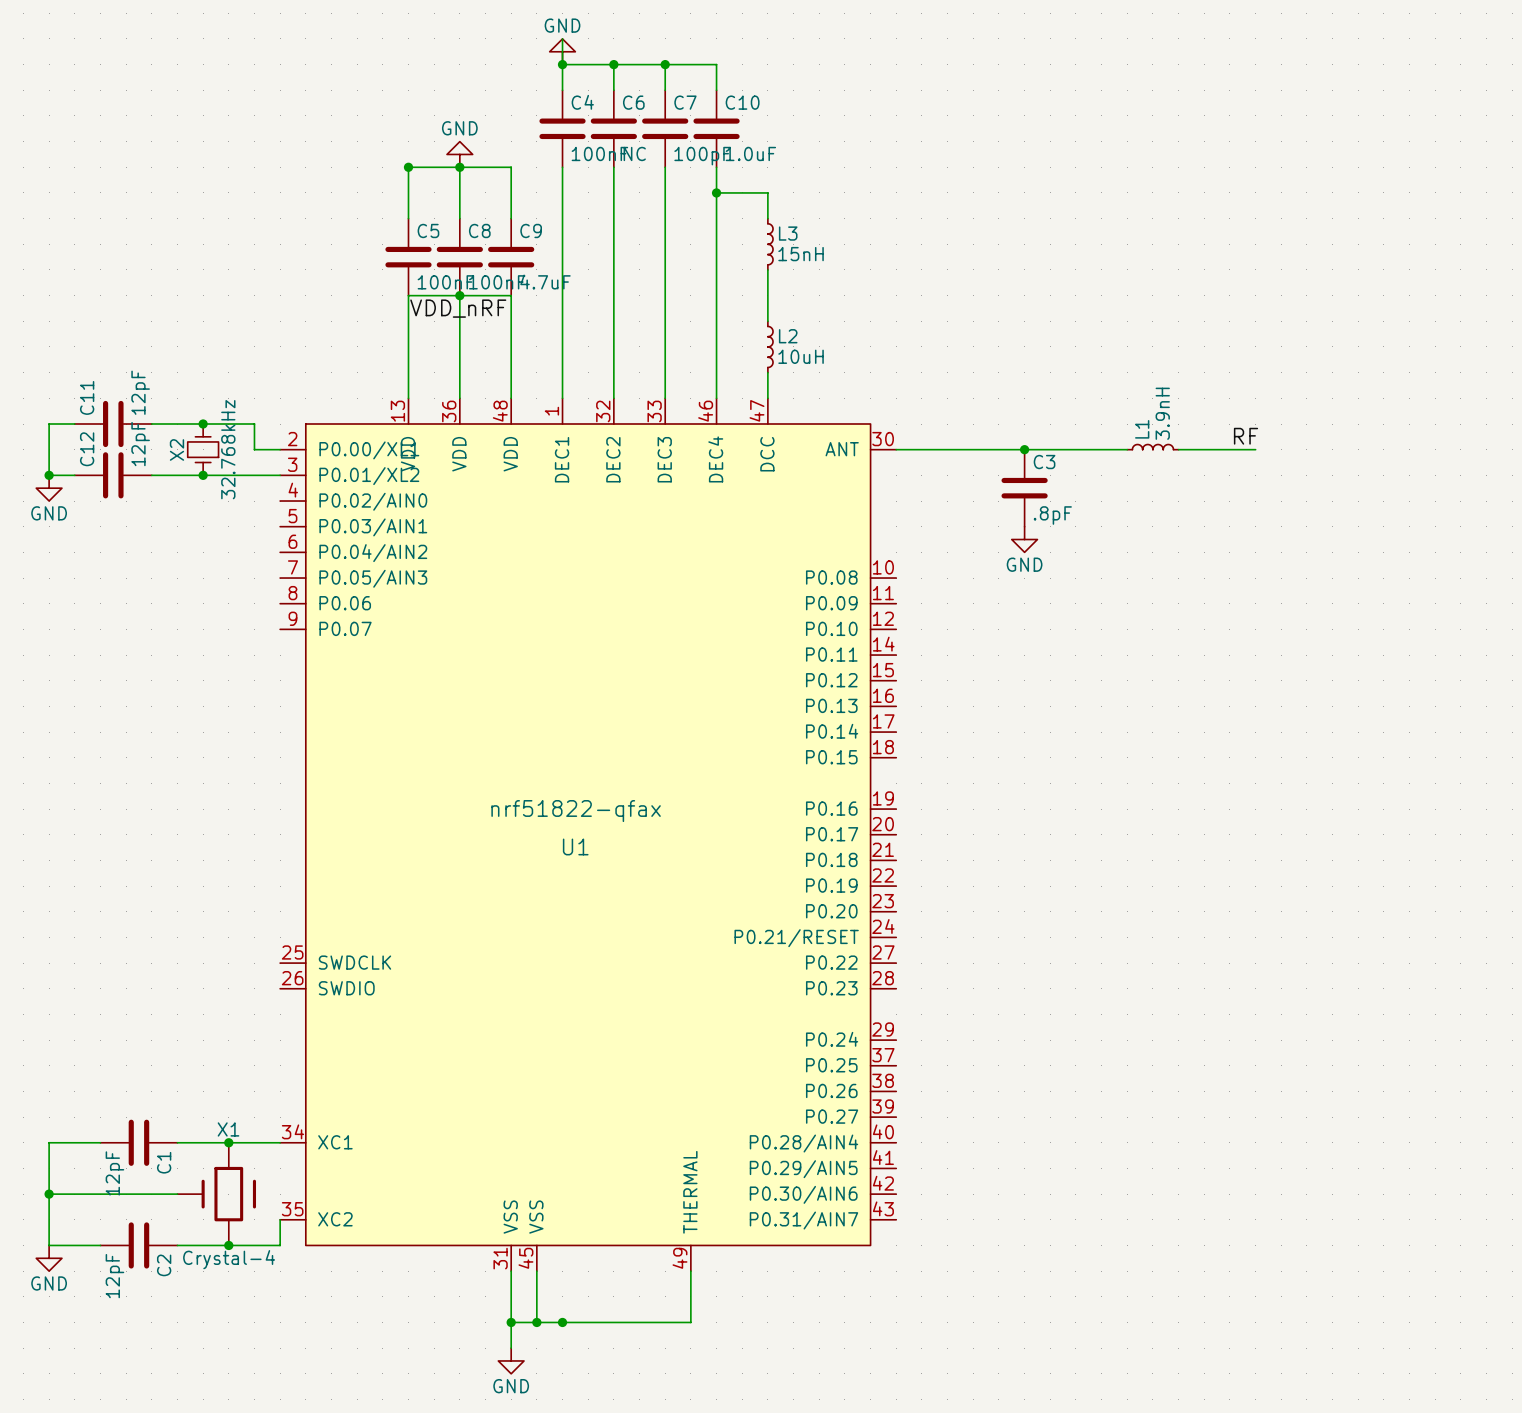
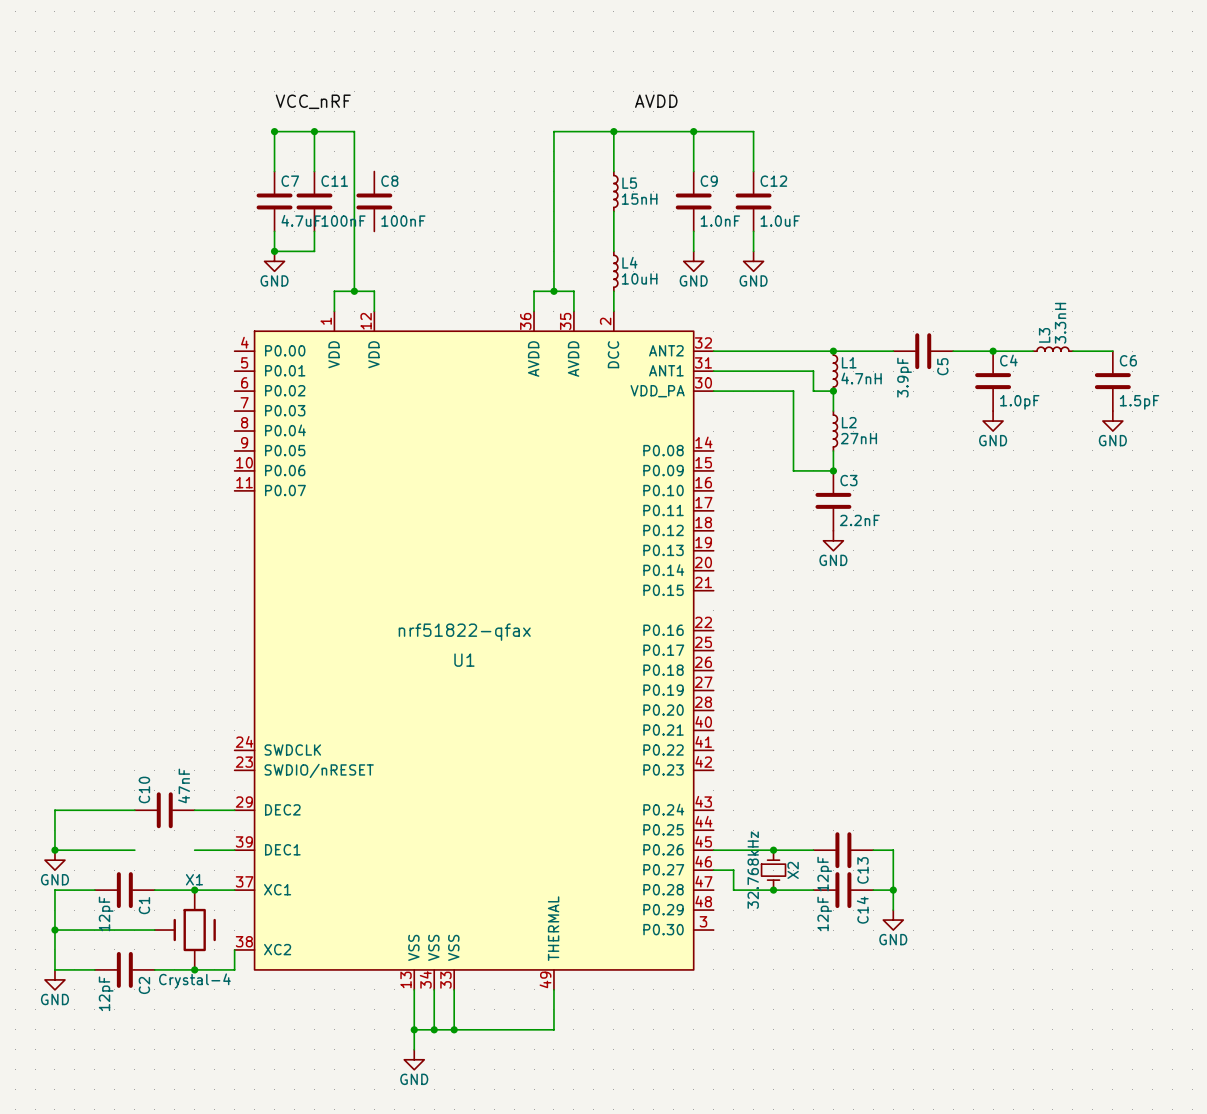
wire: (562, 38) (562, 90) -> none
power symbol: GND (562, 51) -> none
wire: (562, 64) (716, 64) (716, 90) -> none
junction: (562, 64) -> none
wire: (613, 64) (613, 90) -> none
junction: (613, 64) -> none
wire: (665, 64) (665, 90) -> none
junction: (665, 64) -> none
C10 name position: C10 (742, 102) -> C10 (144, 789)
label: none -> VCC_nRF (313, 101)
C4 position: (562, 128) -> (993, 381)
C6 position: (613, 128) -> (1112, 381)
C7 position: (665, 128) -> (274, 201)
C10 rotation: 0° (716, 128) -> 90° clockwise (164, 810)
C10 position: (716, 128) -> (164, 810)
label: none -> AVDD (656, 101)
C4 value: 100nF (599, 153) -> 1.0pF (1019, 402)
C6 value: NC (634, 153) -> 1.5pF (1139, 402)
C10 value: 1.0uF (750, 153) -> 47nF (184, 785)
power symbol: GND (459, 154) -> none
C7 value: 100pF (702, 156) -> 4.7uF (301, 220)
junction: none -> (274, 131)
wire: (408, 167) (408, 218) -> (334, 131) (274, 131) (274, 171)
junction position: (408, 167) -> (314, 131)
wire: (434, 167) (511, 167) (511, 218) -> (354, 131) (354, 291)
wire: (459, 167) (459, 218) -> (314, 131) (314, 171)
junction: (459, 167) -> none
wire: (562, 167) (562, 398) -> none
wire: (613, 167) (613, 398) -> none
wire: (665, 167) (665, 372) -> (573, 291) (534, 291)
wire: (716, 167) (716, 372) -> none
wire: none -> (693, 131) (693, 171)
junction: none -> (693, 131)
wire: (716, 192) (767, 192) -> (613, 131) (613, 151)
junction position: (716, 192) -> (613, 131)
wire: none -> (753, 171) (753, 131) (553, 131) (553, 291)
L3 name: L3 (788, 233) -> L5 (629, 183)
C5 rotation: 0° (408, 257) -> 90° clockwise (923, 351)
C5 position: (408, 257) -> (923, 351)
C9 position: (511, 257) -> (693, 201)
C5 value: 100nF (445, 282) -> 3.9pF (904, 377)
C9 value: 4.7uF (545, 282) -> 1.0nF (720, 221)
wire: none -> (274, 231) (274, 251) (314, 251) (314, 231)
wire: (459, 295) (459, 372) -> none
junction: (459, 295) -> none
wire: none -> (693, 231) (693, 251)
wire: none -> (753, 231) (753, 251)
label: VDD_nRF (458, 308) -> none
junction: none -> (274, 251)
power symbol: none -> GND (274, 261)
power symbol: none -> GND (693, 261)
power symbol: none -> GND (753, 261)
L2 name: L2 (788, 336) -> L4 (629, 262)
wire: (408, 372) (408, 295) (511, 295) (511, 398) -> (334, 291) (374, 291)
junction: none -> (354, 291)
junction: none -> (553, 291)
C11 value: 12pF (140, 392) -> 100nF (343, 221)
U1 symbol: [280, 398, 897, 1272] -> [234, 311, 714, 990]
L1 value: 3.9nH (1162, 413) -> 4.7nH (861, 378)
wire: (74, 424) (49, 424) (49, 475) (74, 475) -> none
C11 rotation: 0° (113, 424) -> 90° clockwise (314, 201)
C11 position: (113, 424) -> (314, 201)
wire: (151, 424) (254, 424) (254, 449) (280, 449) -> none
junction: (203, 424) -> none
label: RF (1246, 436) -> none
C12 value: 12pF (140, 444) -> 1.0uF (780, 221)
L1 rotation: 0° (1152, 447) -> 90° clockwise (835, 371)
L1 position: (1152, 447) -> (835, 371)
L3: none -> 3.3nH (1052, 349)
X2 name position: X2 (176, 449) -> X2 (793, 870)
X2 position: (203, 449) -> (773, 870)
X2 value position: 32.768kHz (228, 449) -> 32.768kHz (753, 870)
junction position: (1024, 449) -> (833, 351)
wire: none -> (993, 351) (1033, 351)
junction: none -> (993, 351)
wire: none -> (1072, 351) (1112, 351)
junction: (49, 475) -> none
C12 rotation: 0° (113, 475) -> 90° clockwise (753, 201)
C12 position: (113, 475) -> (753, 201)
wire: (151, 475) (280, 475) -> none
junction: (203, 475) -> none
wire: none -> (713, 371) (813, 371) (813, 391) (833, 391) (833, 411)
power symbol: GND (49, 488) -> none
C3 position: (1024, 488) -> (833, 500)
wire: none -> (713, 391) (793, 391) (793, 470) (833, 470) (833, 450)
junction: none -> (833, 391)
C3 value: .8pF (1052, 515) -> 2.2nF (859, 520)
power symbol: GND (1024, 539) -> none
power symbol: none -> GND (993, 421)
power symbol: none -> GND (1112, 421)
L2: none -> 27nH (835, 431)
junction: none -> (833, 470)
power symbol: none -> GND (833, 540)
wire: none -> (134, 810) (54, 810) (54, 850) (134, 850)
wire: none -> (194, 810) (234, 810)
junction: none -> (54, 850)
wire: none -> (194, 850) (234, 850)
wire: none -> (713, 850) (813, 850)
junction: none -> (773, 850)
C13: none -> 12pF (843, 850)
wire: none -> (873, 850) (893, 850) (893, 910)
power symbol: none -> GND (54, 860)
wire: none -> (713, 870) (733, 870) (733, 890) (813, 890)
junction: none -> (773, 890)
C14: none -> 12pF (843, 890)
wire: none -> (873, 890) (893, 890)
junction: none -> (893, 890)
power symbol: none -> GND (893, 920)
wire: none -> (454, 989) (454, 1029)

